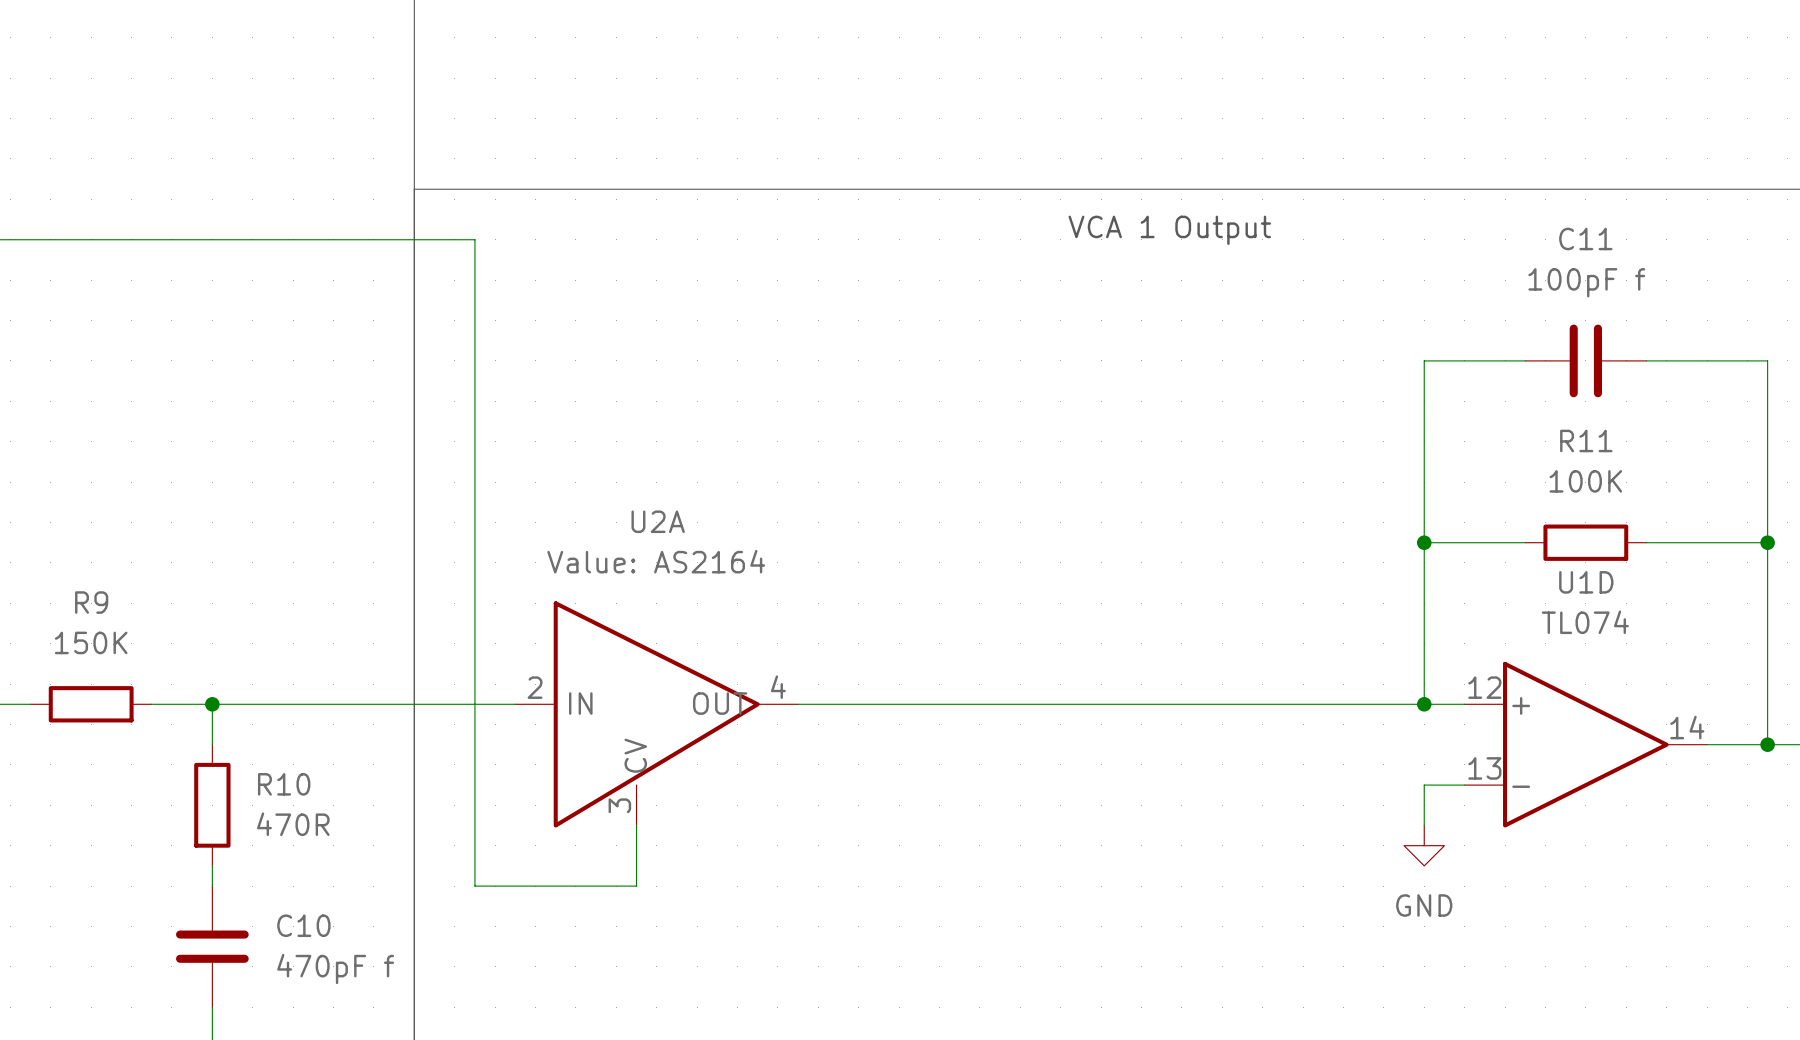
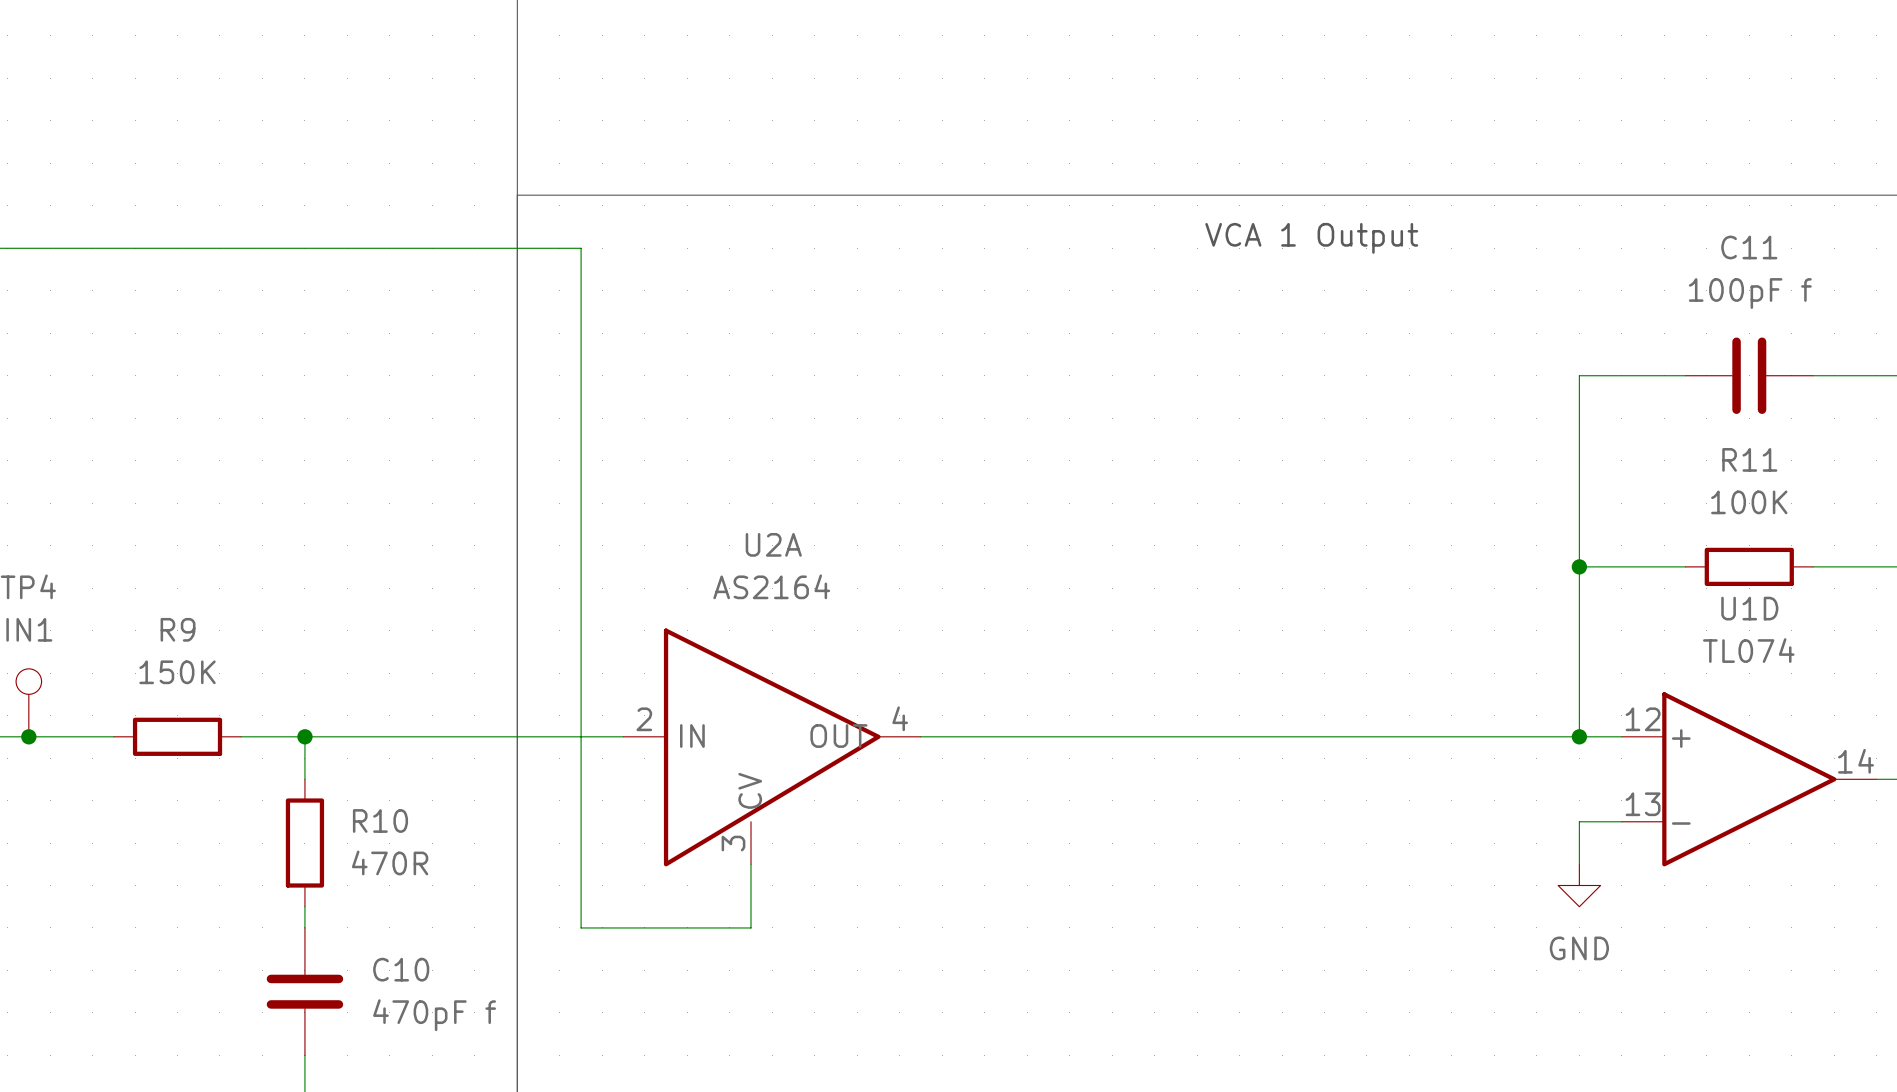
U2A value: Value: AS2164 (656, 561) -> AS2164 (771, 586)

